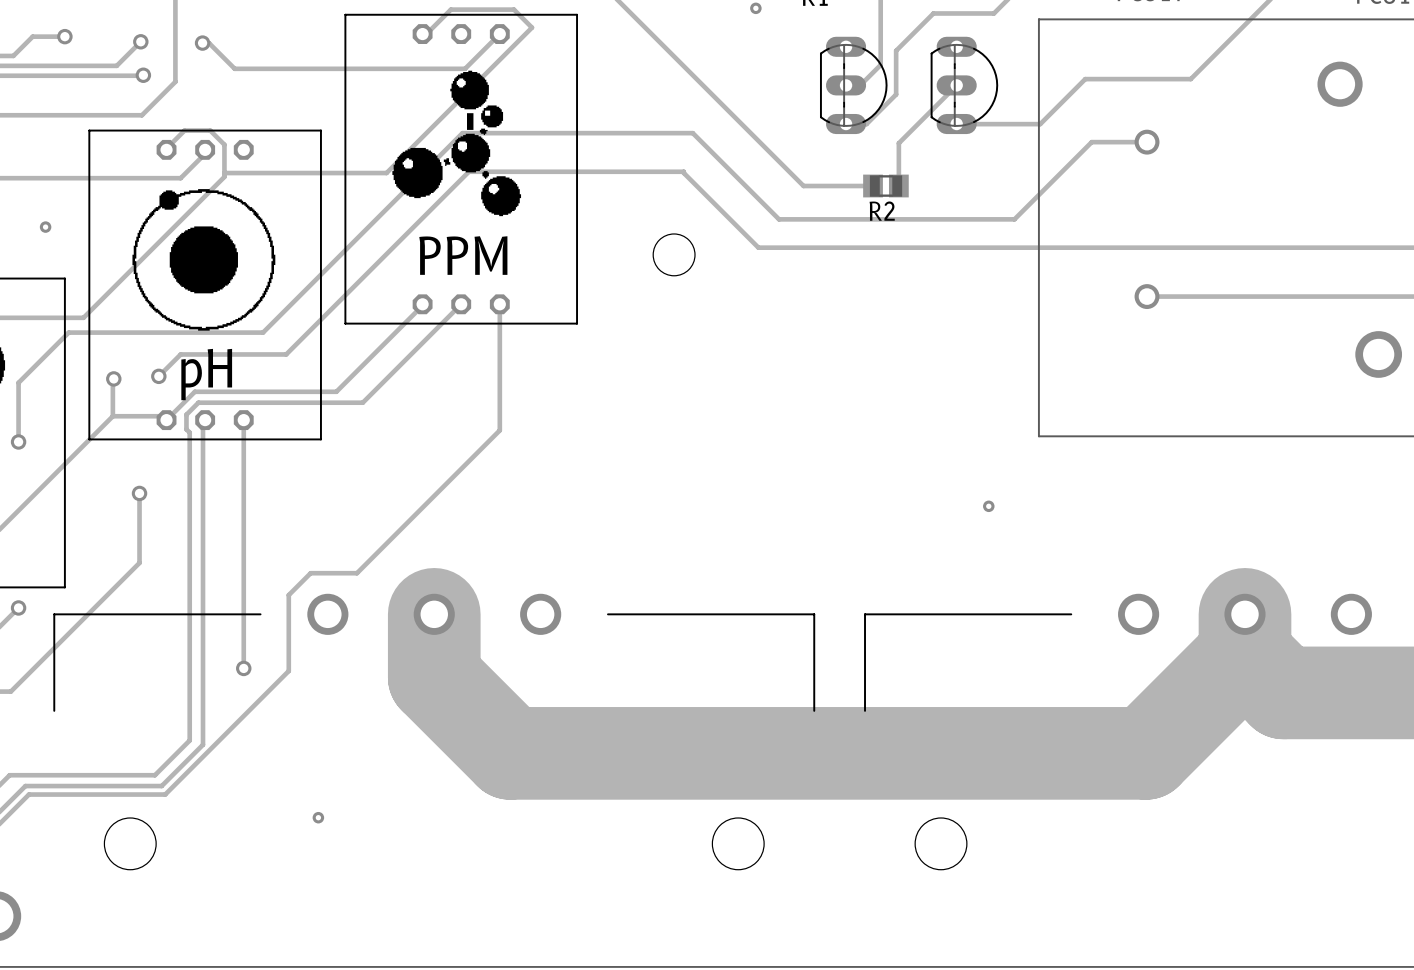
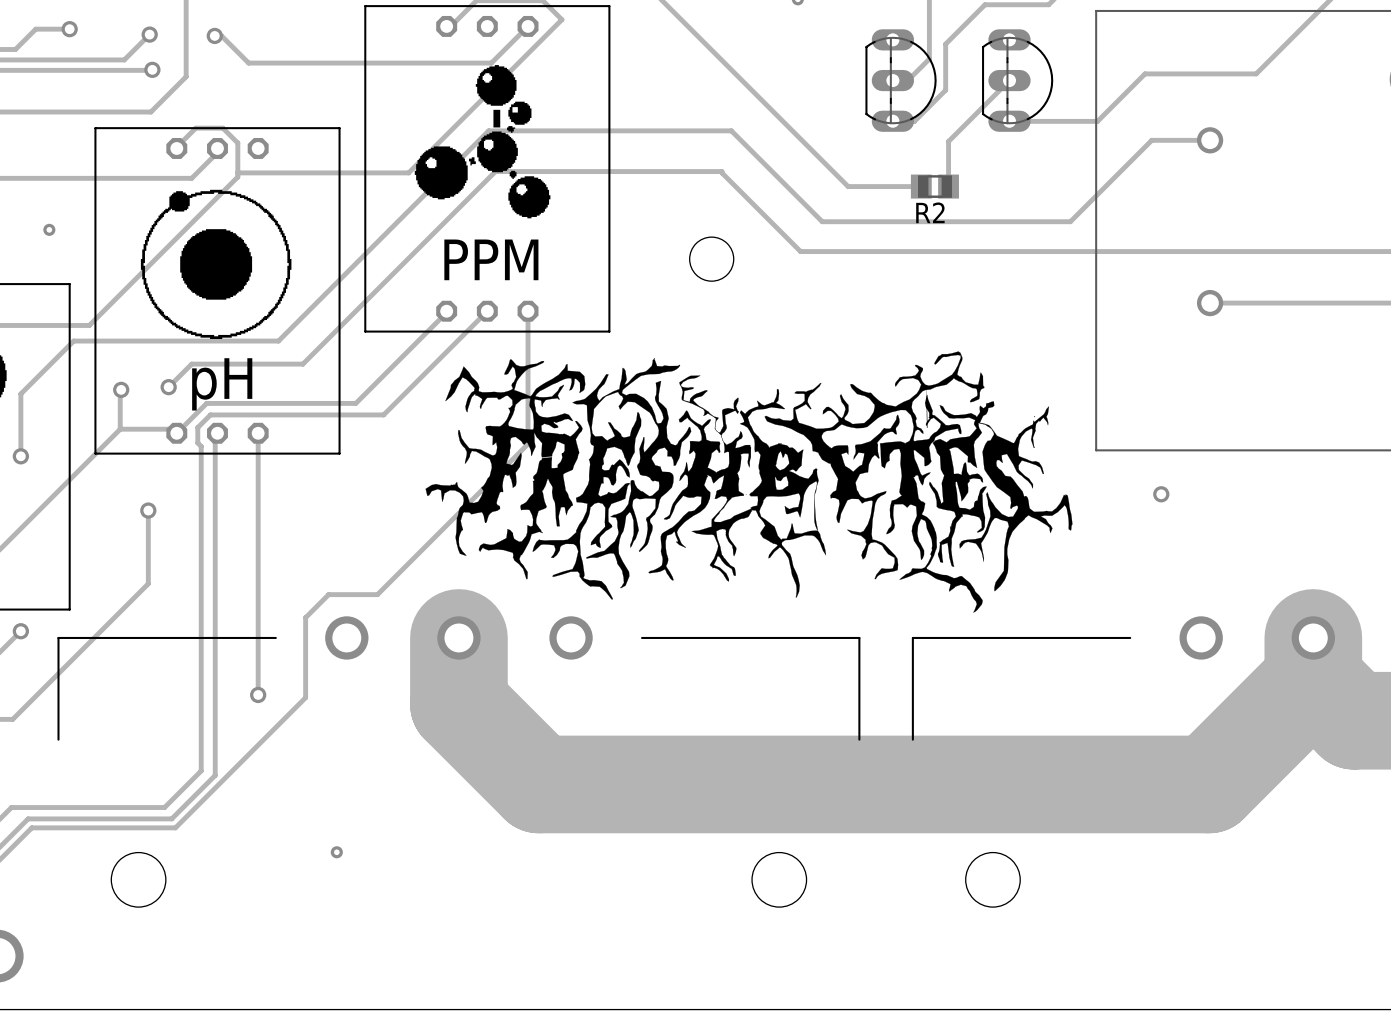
drawing: none -> [425, 351, 1073, 613]
via: none -> (1161, 494)
via: (988, 506) -> none

